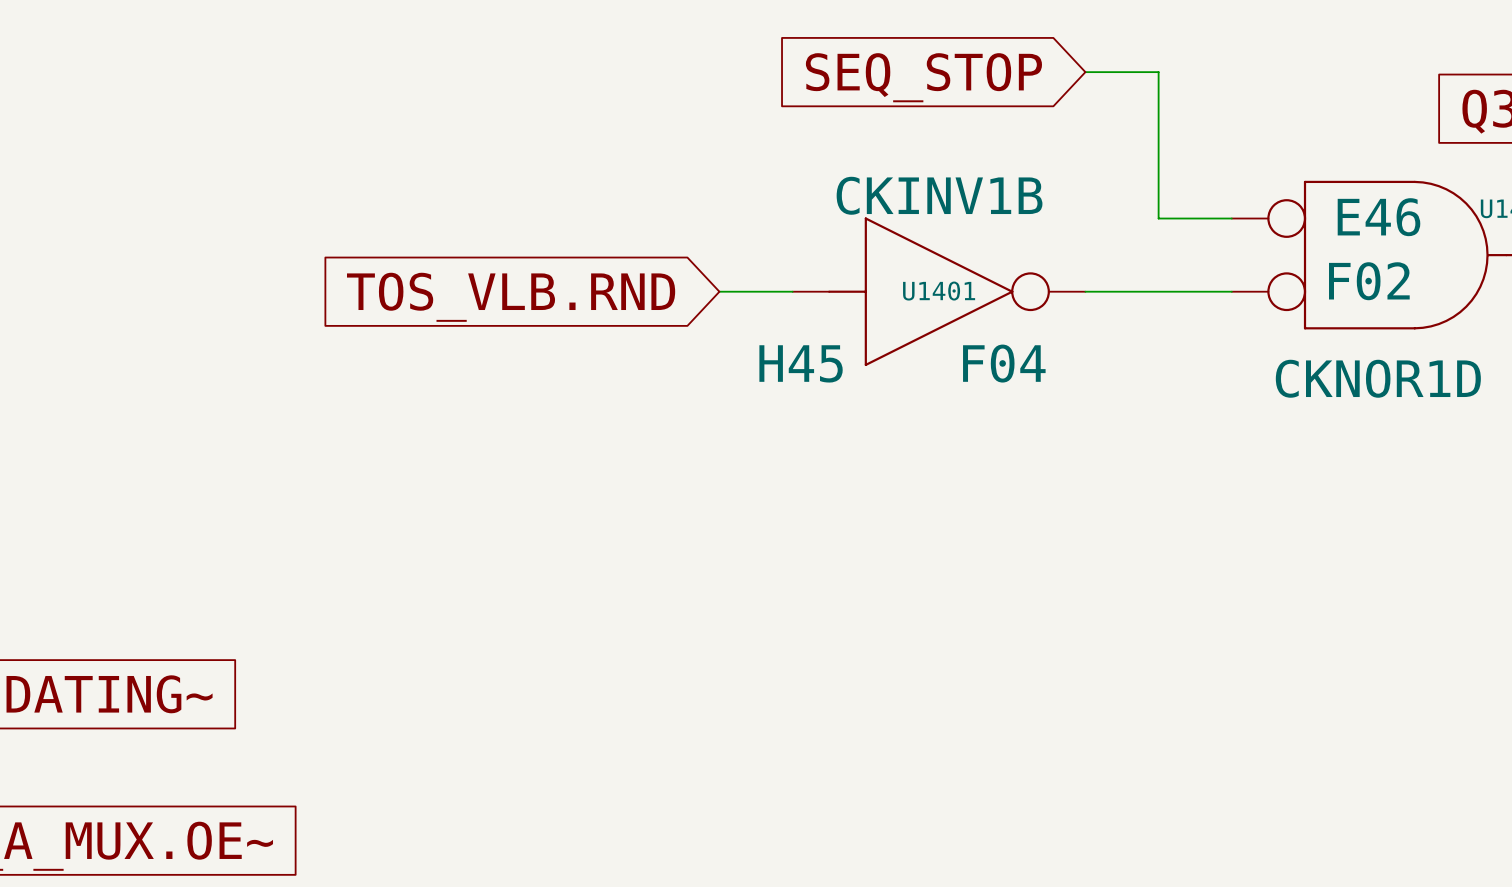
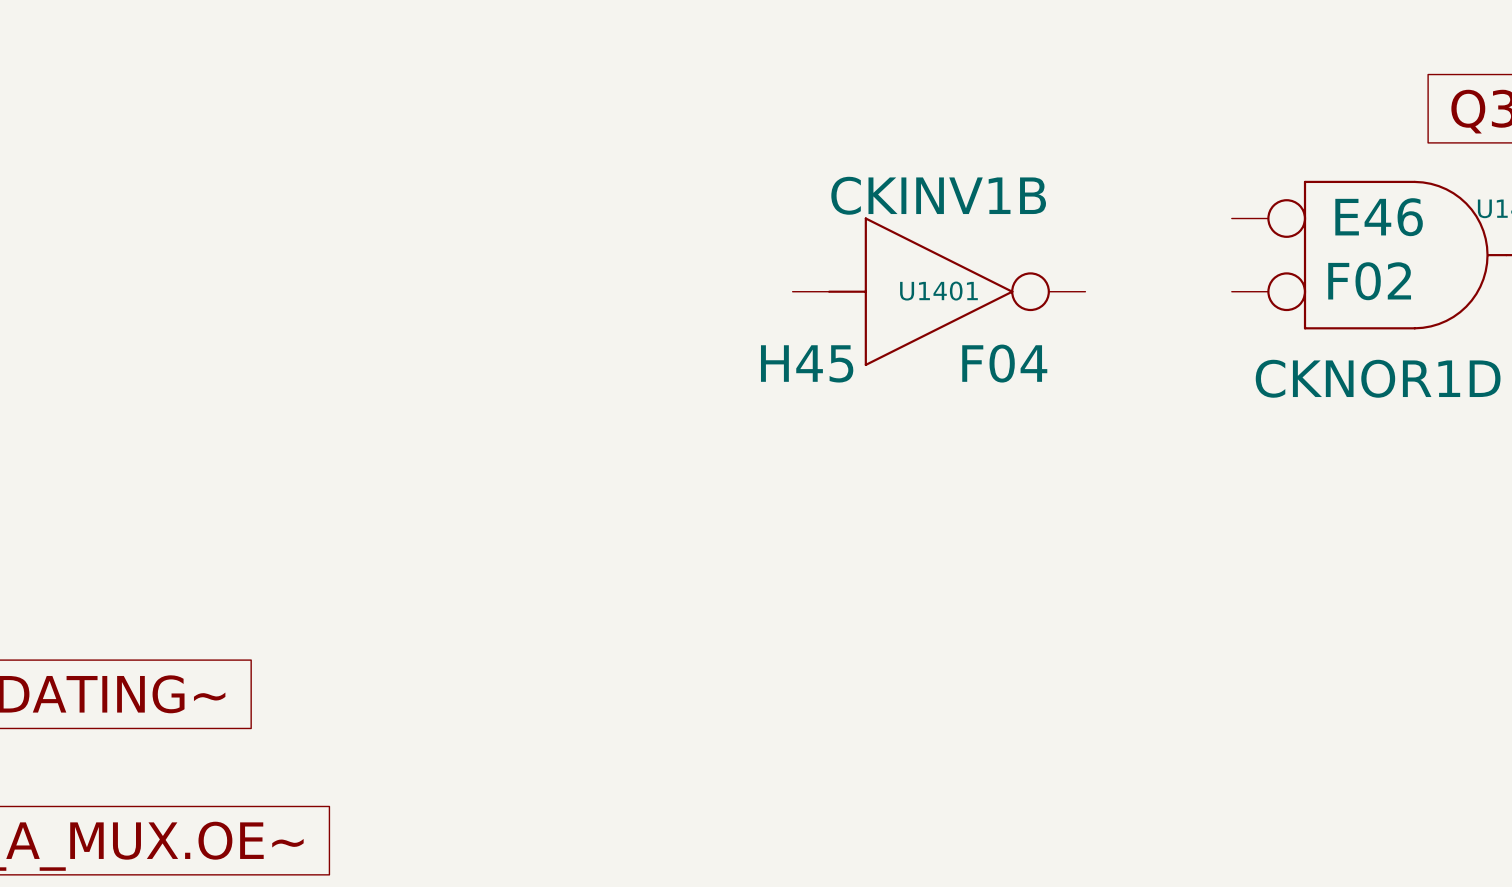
wire: (1085, 72) (1158, 72) (1158, 218) (1231, 218) -> none
global label: SEQ_STOP (923, 77) -> none
wire: (719, 291) (792, 291) -> none
wire: (1085, 291) (1231, 291) -> none
global label: TOS_VLB.RND (511, 297) -> none

